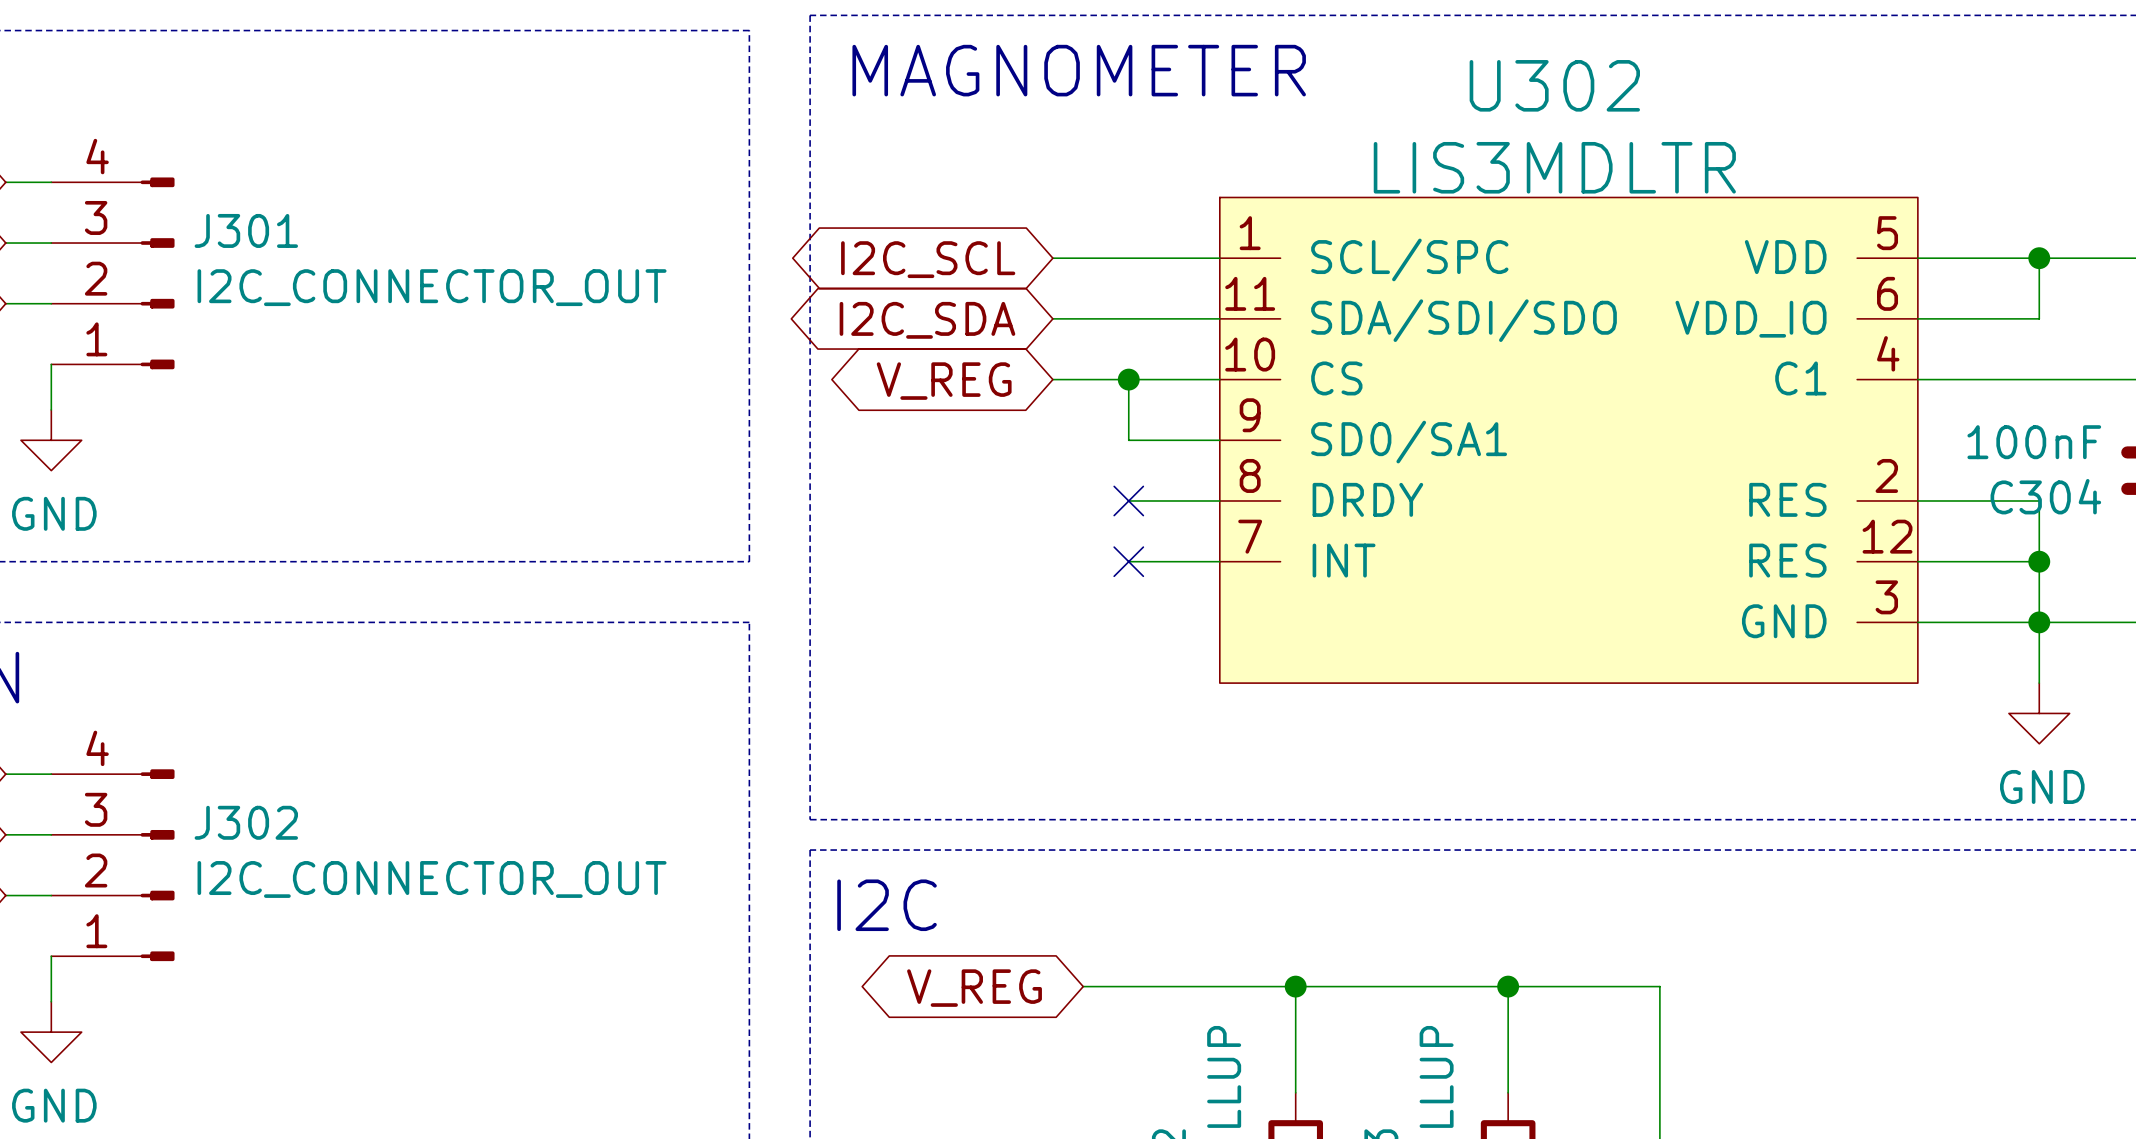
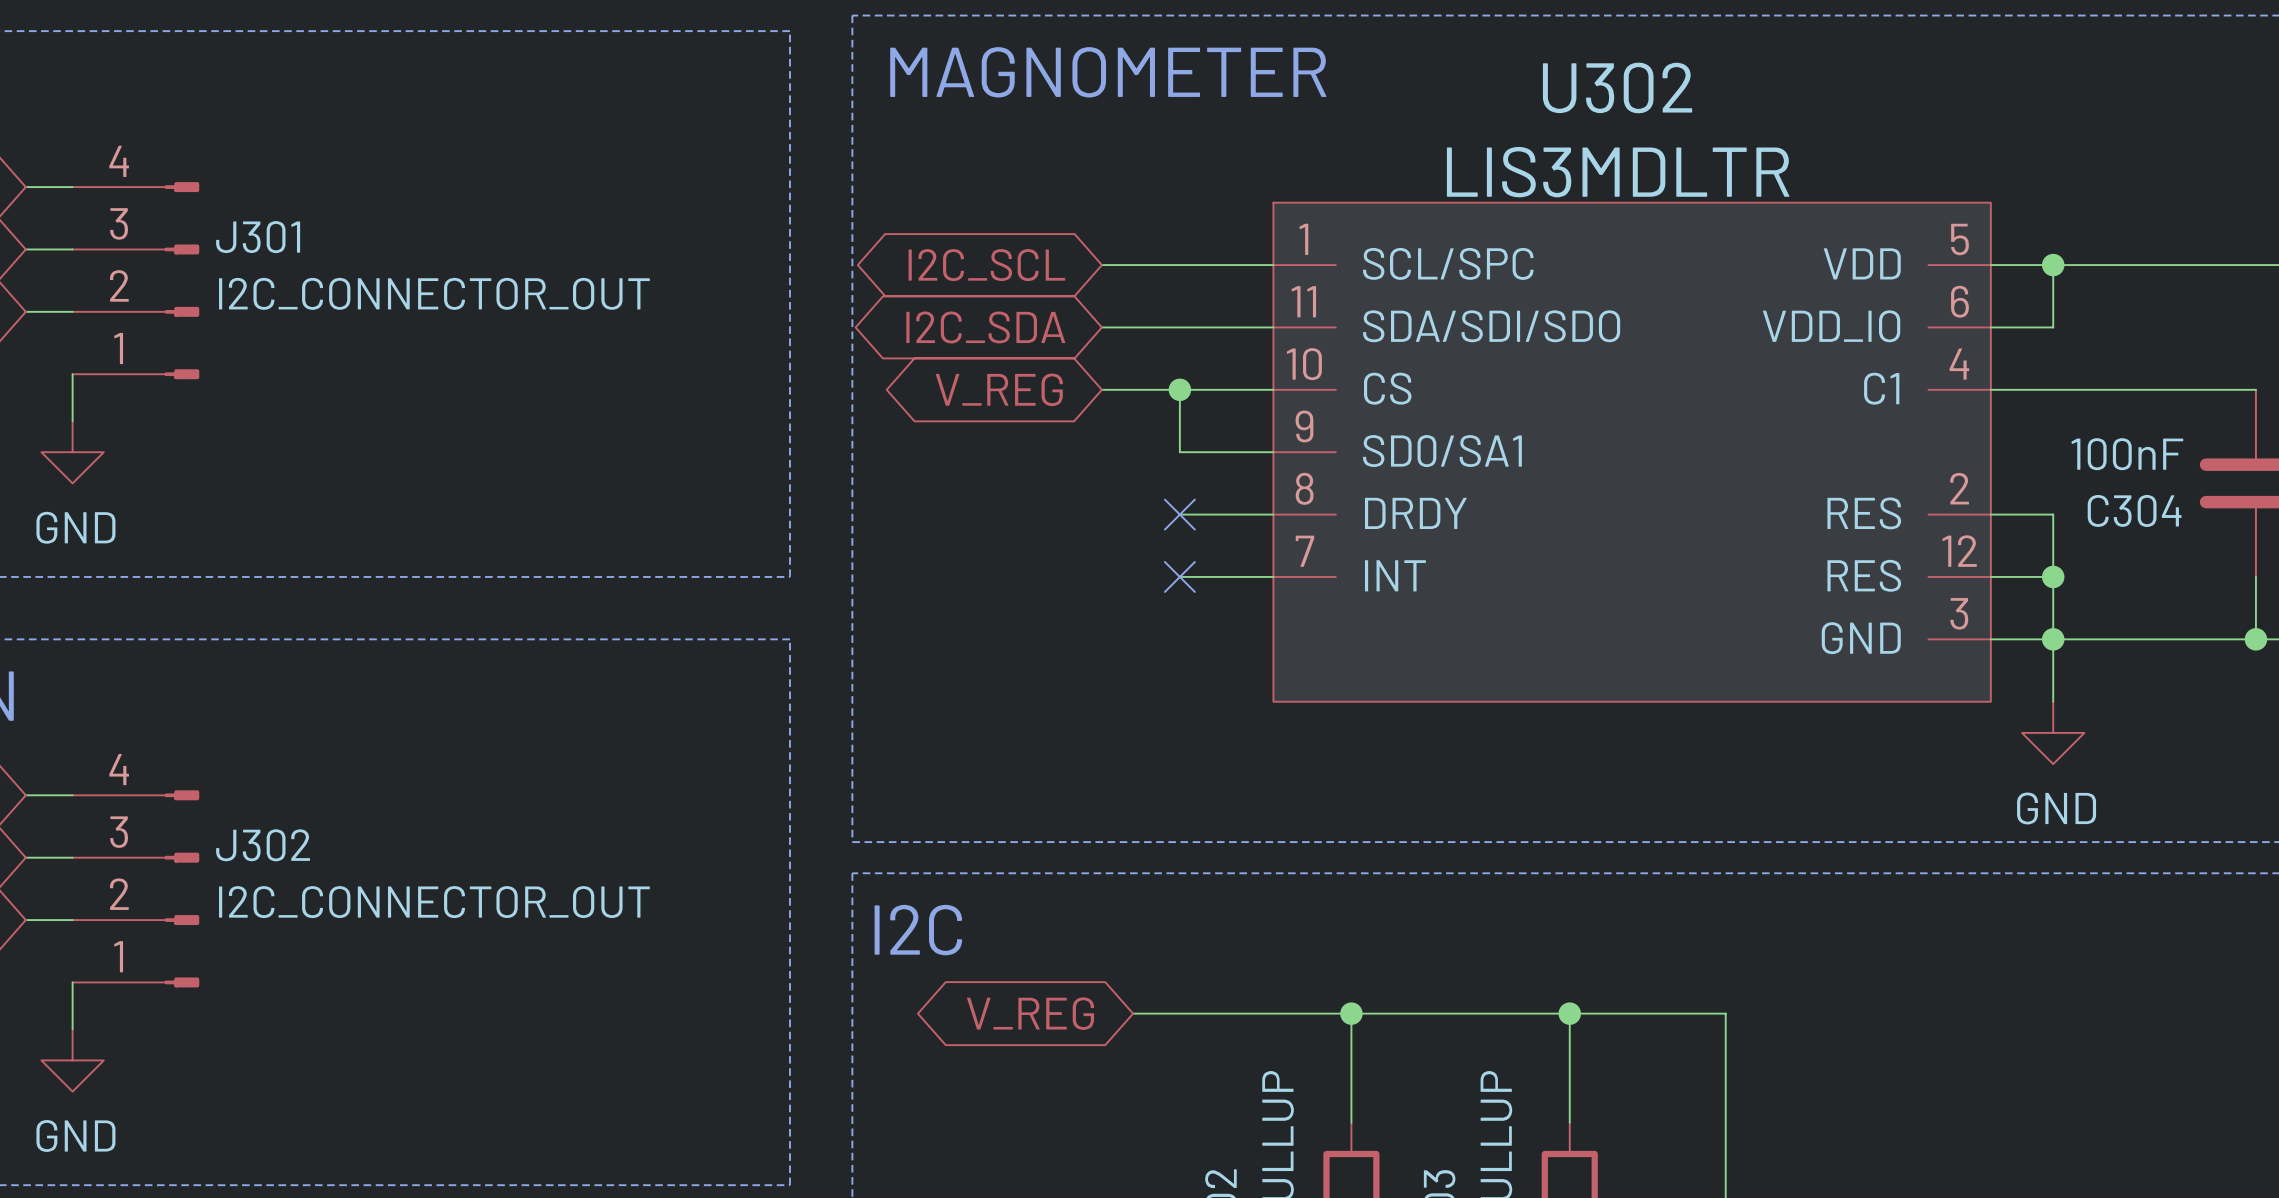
wire: (2039, 258) (2039, 318) (1978, 318) -> (2053, 265) (2053, 327)
junction position: (2039, 258) -> (2053, 265)
wire: (1978, 500) (2039, 500) (2039, 683) -> (2053, 514) (2053, 701)
wire: (1978, 561) (2039, 561) -> none
junction: none -> (2053, 576)
junction: (2039, 561) -> none
junction: none -> (2053, 639)
junction: (2039, 622) -> none
power symbol position: GND (2039, 713) -> GND (2053, 732)

